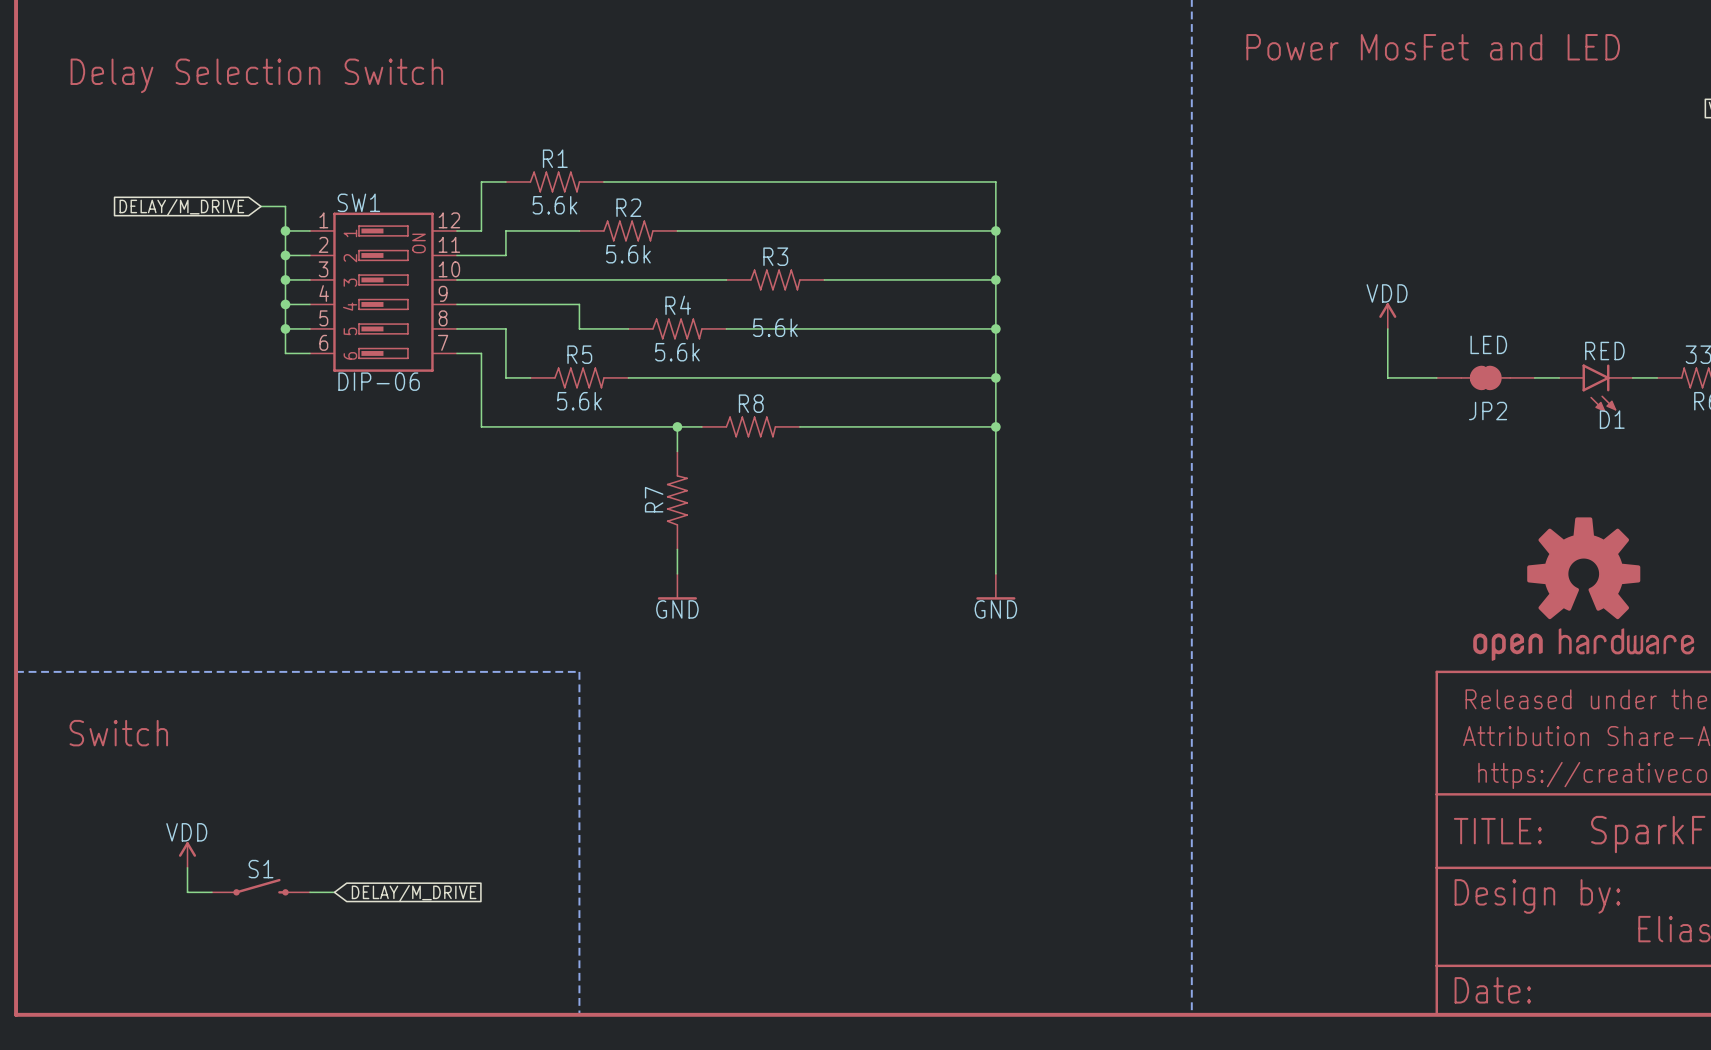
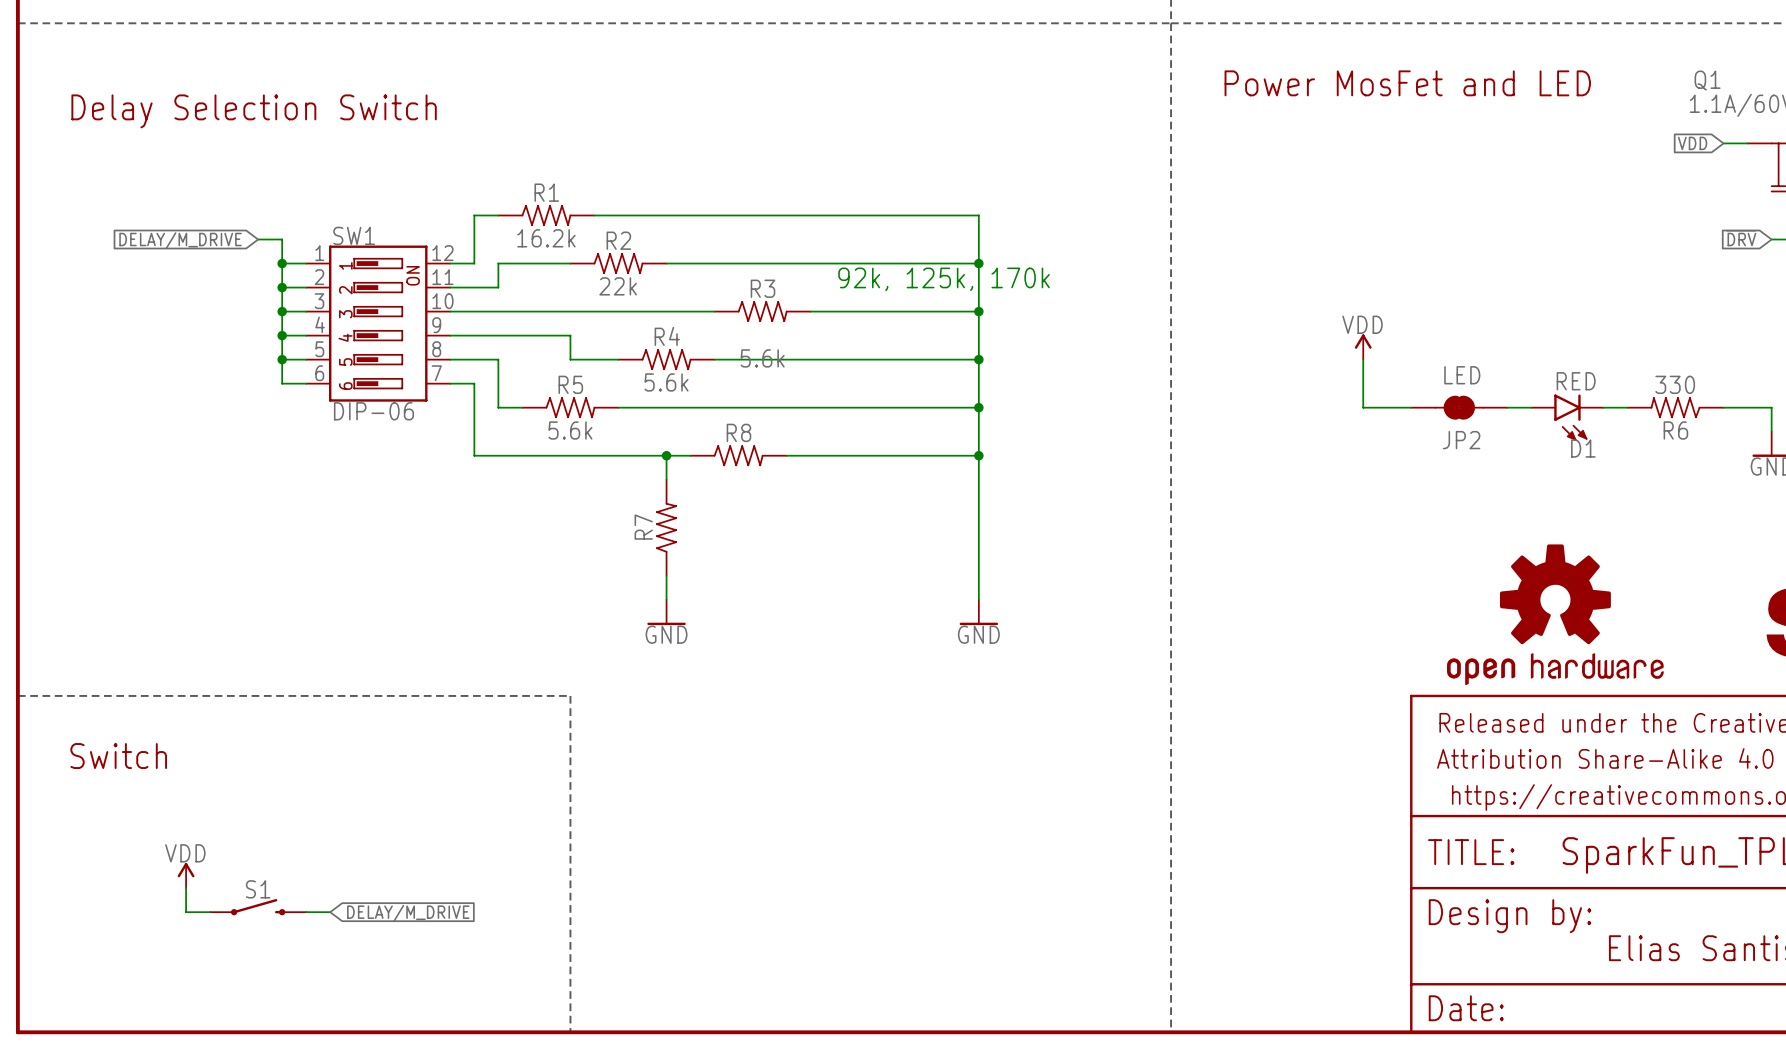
R1 value: 5.6k (554, 205) -> 16.2k (546, 238)
text: none -> 92k, 125k, 170k (944, 279)
R2 value: 5.6k (628, 254) -> 22k (618, 286)

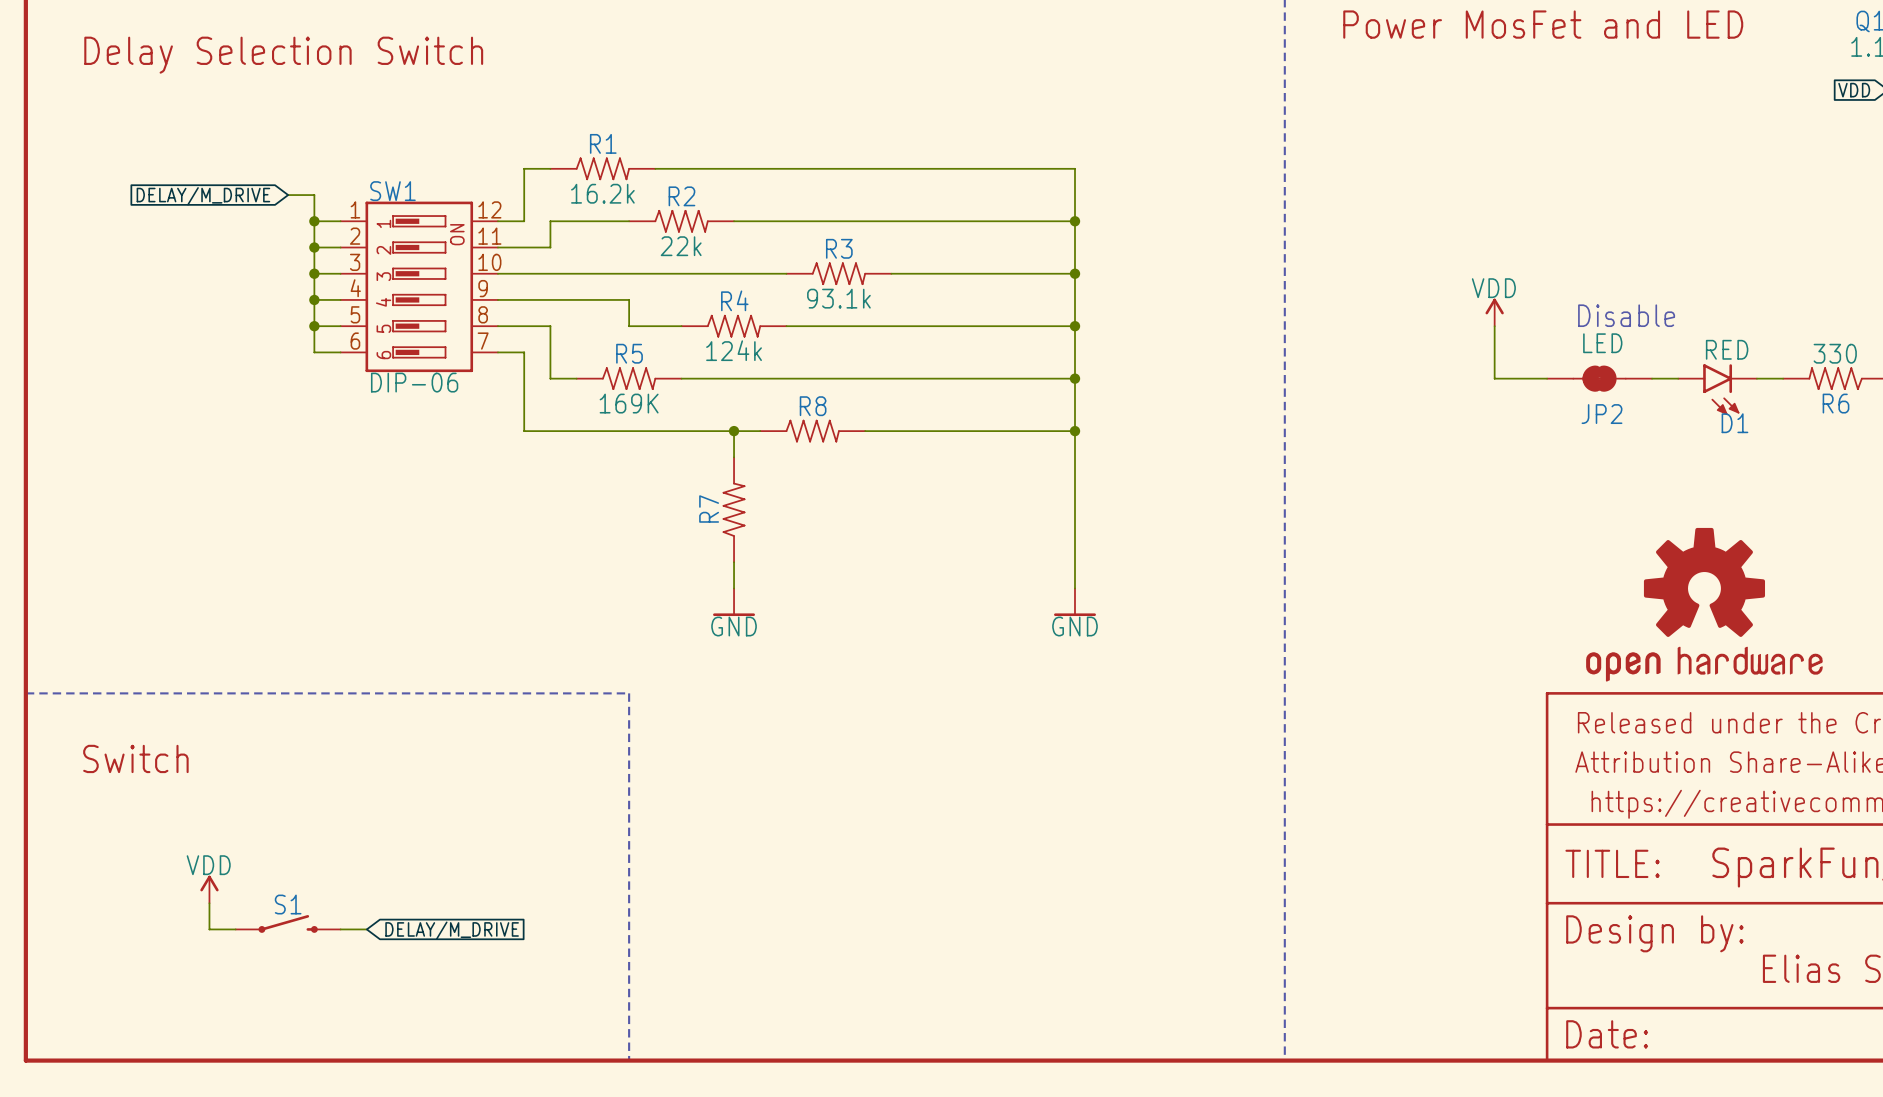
text: 92k, 125k, 170k (944, 279) -> none
text: none -> Disable (1626, 315)
R3 value: 5.6k (762, 358) -> 93.1k (838, 298)
R4 value: 5.6k (666, 382) -> 124k (734, 350)
R5 value: 5.6k (570, 430) -> 169K (629, 403)

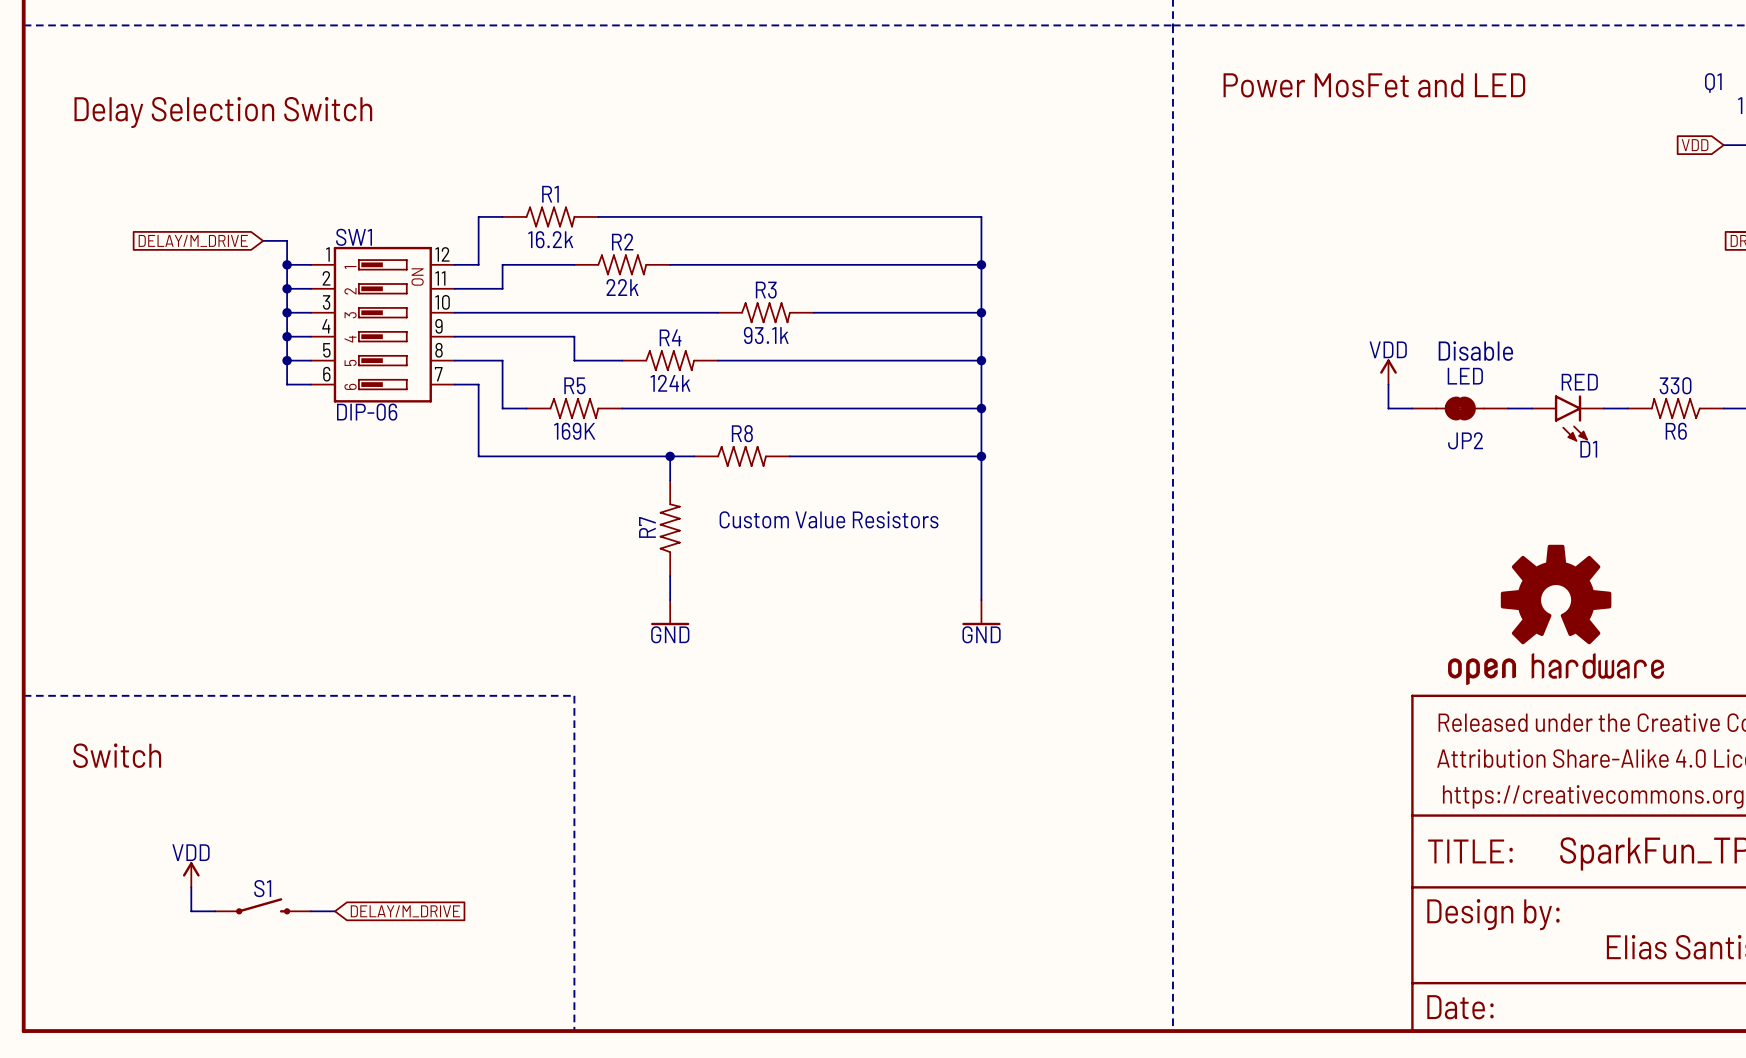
power symbol position: VDD (1494, 312) -> VDD (1388, 372)
wire: (1494, 326) (1494, 378) (1520, 378) -> (1388, 384) (1388, 408)
text: none -> Custom Value Resistors (829, 519)

